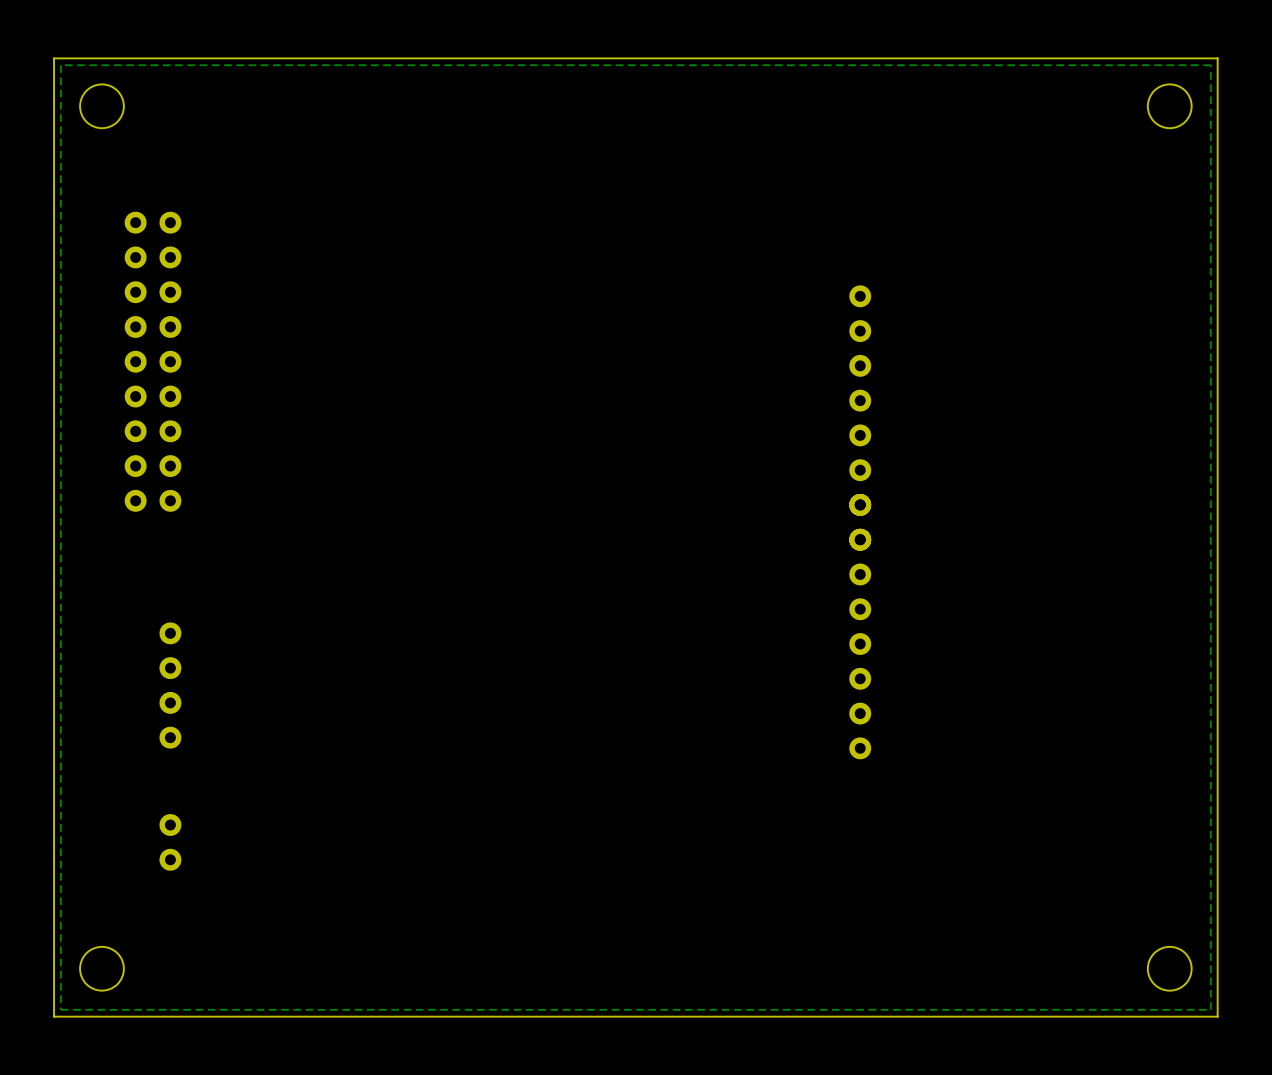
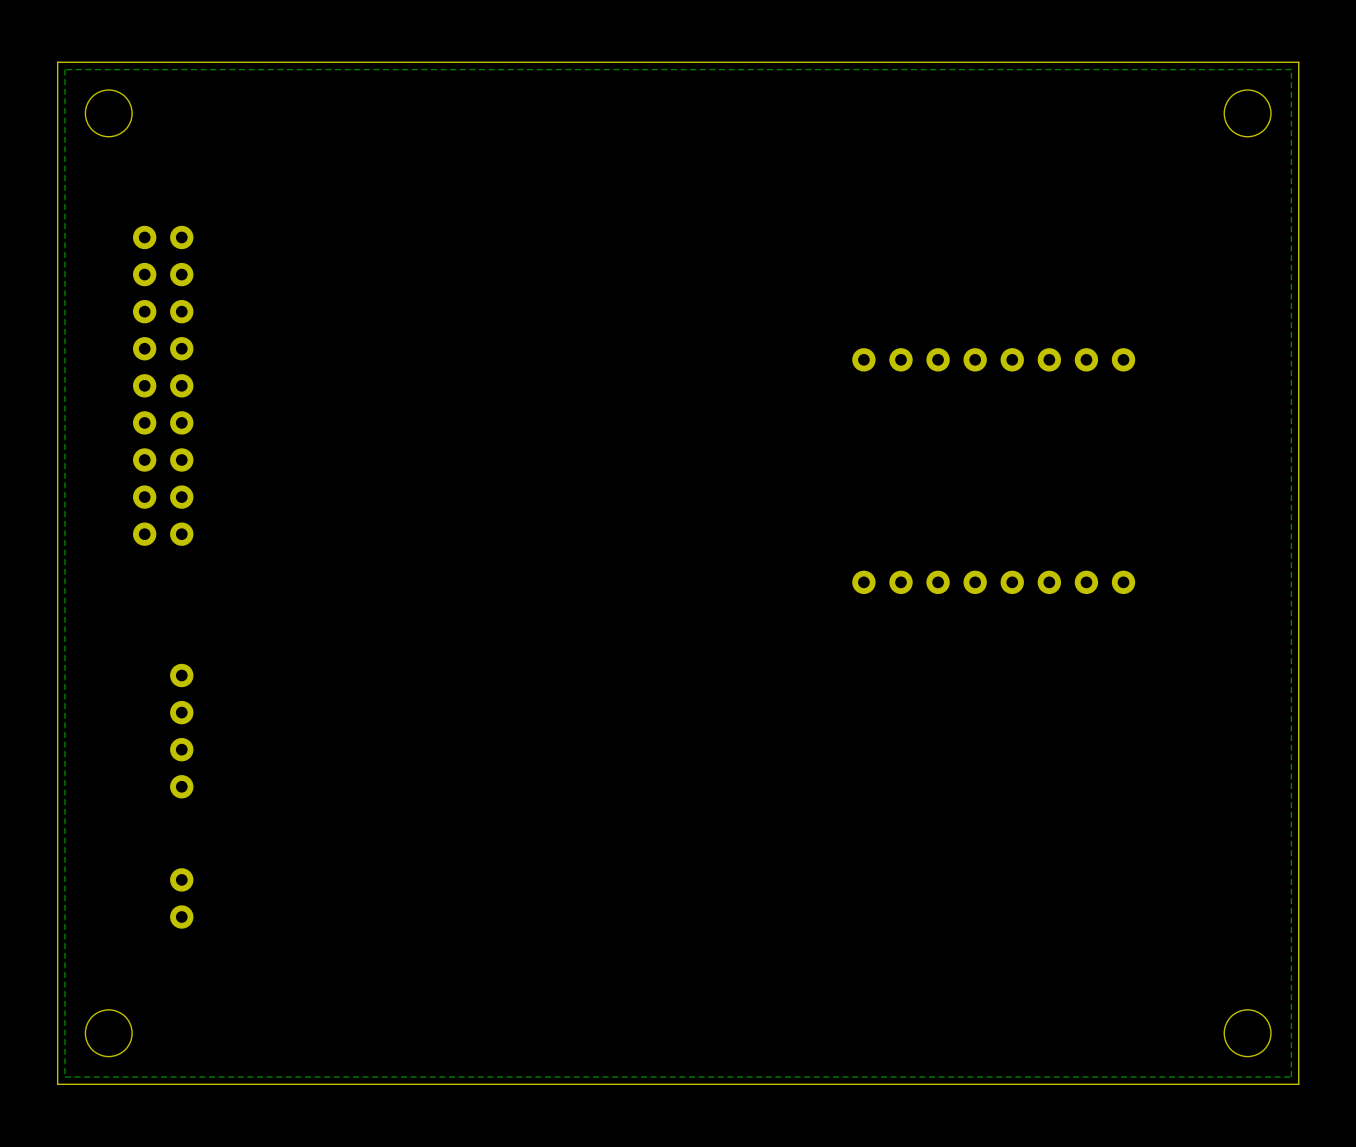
part: none -> (993, 359)
part: (860, 418) -> none
part: none -> (993, 582)
part: (860, 626) -> none

